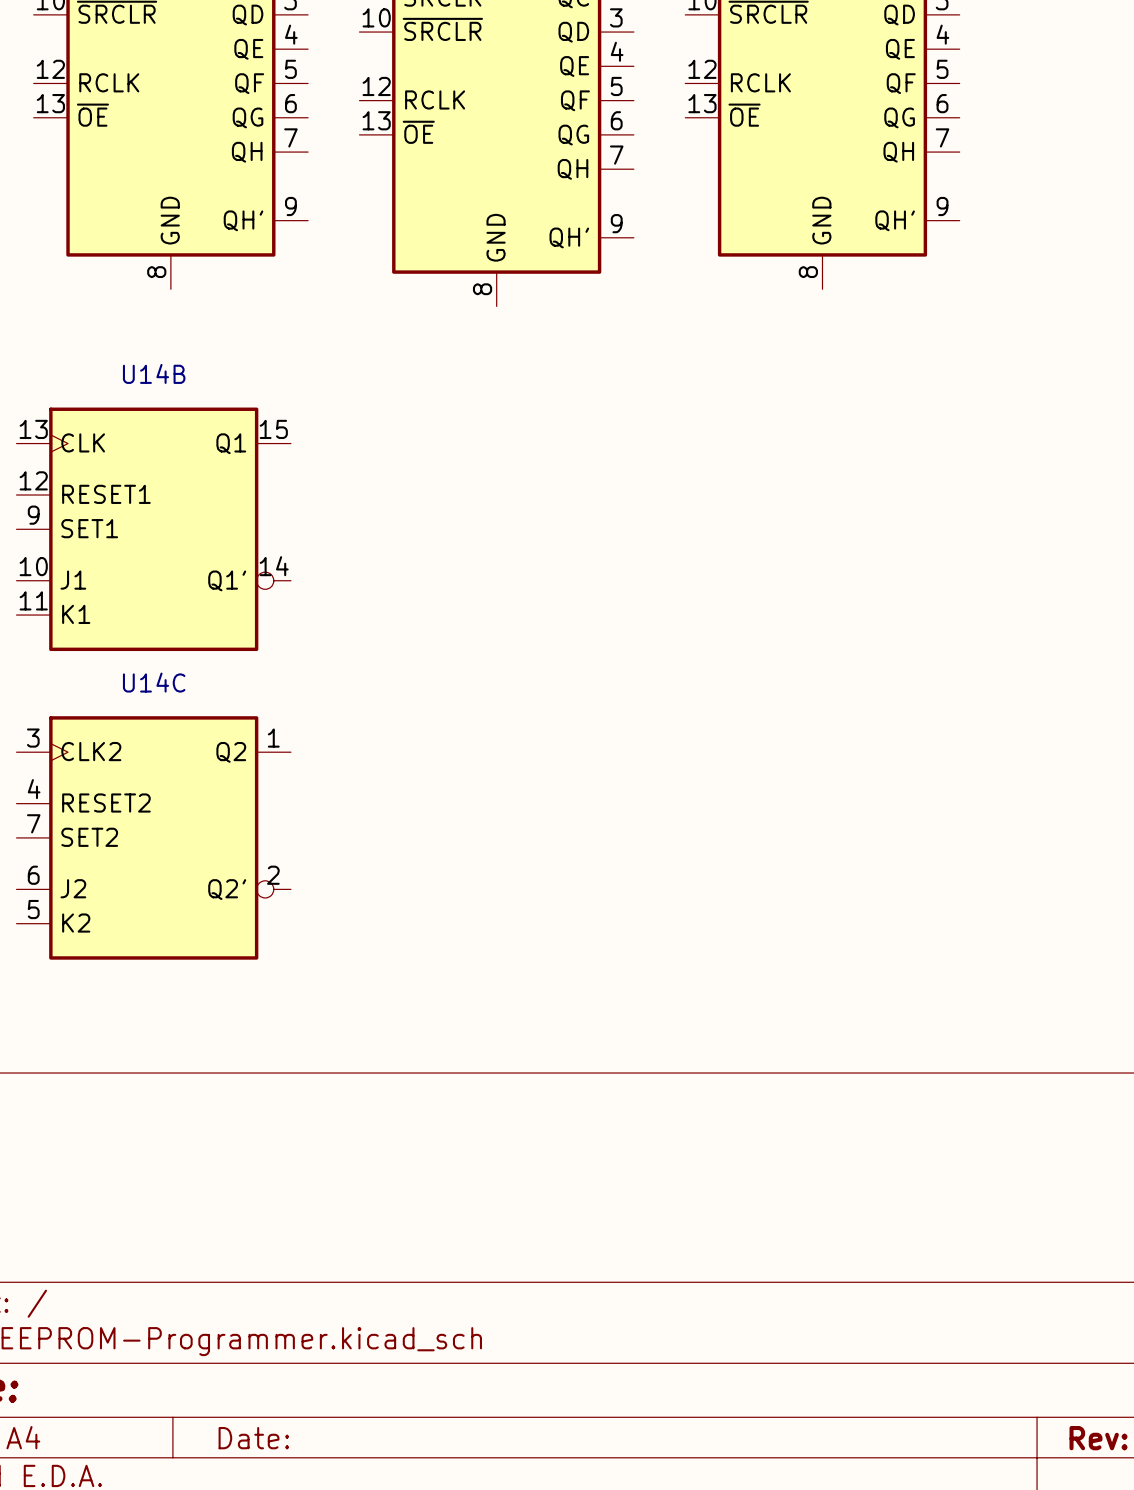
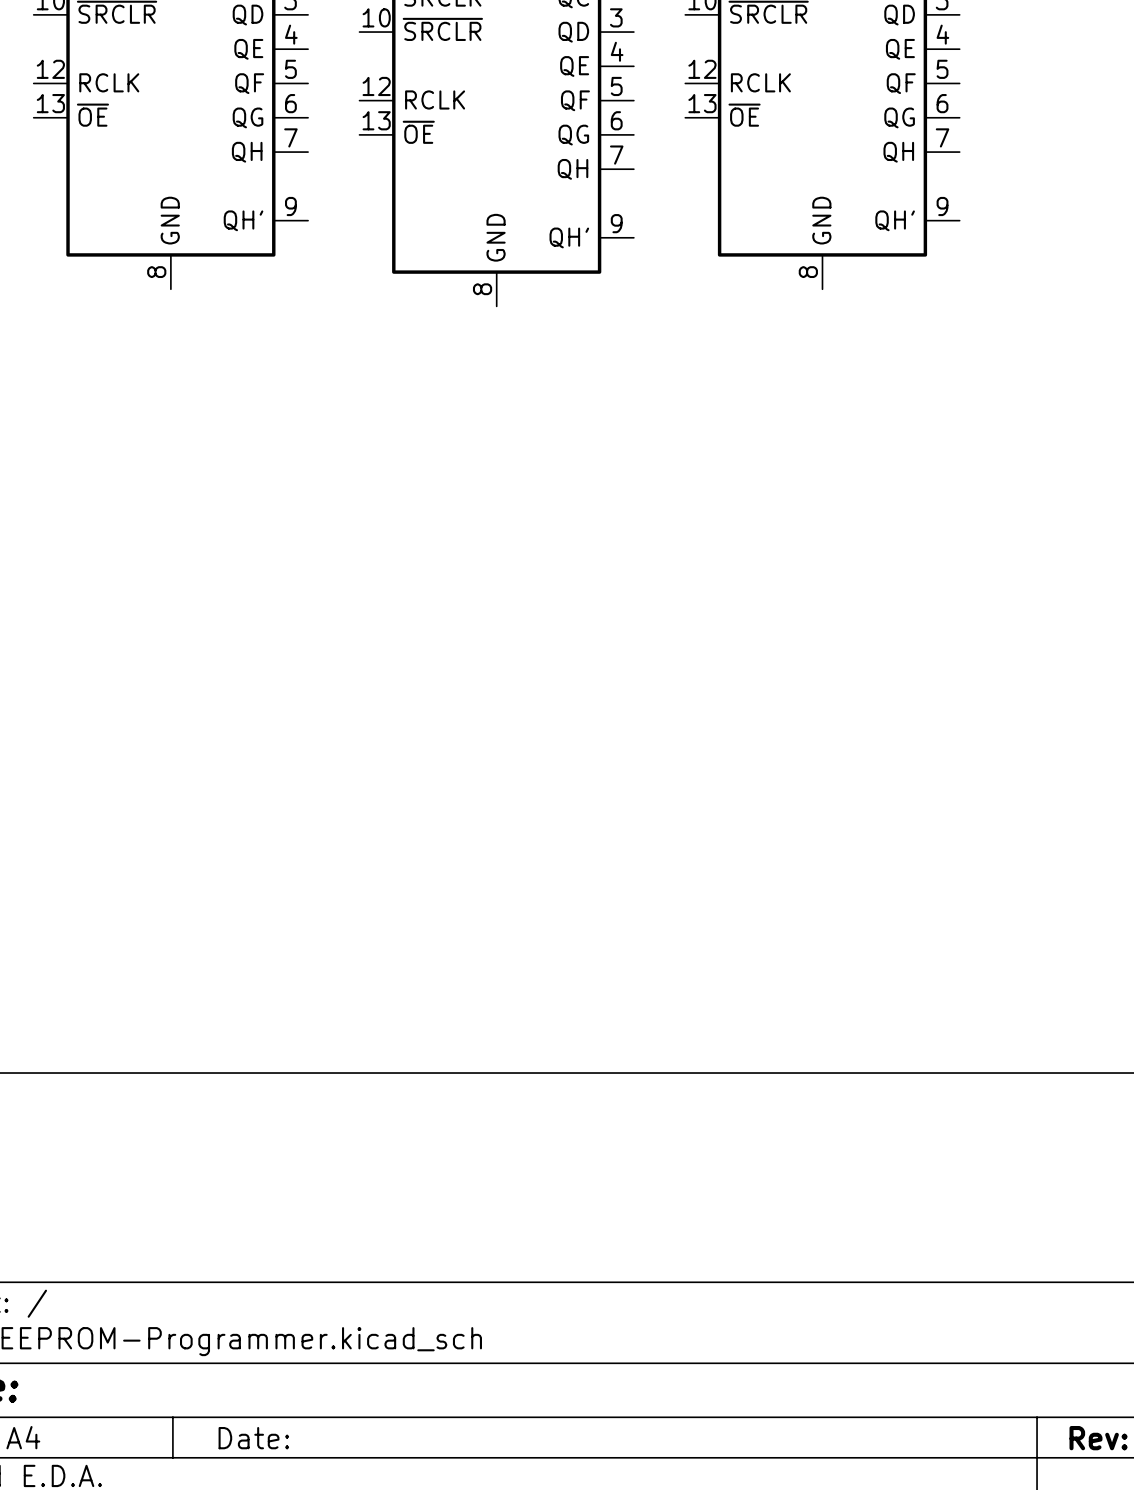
U14B: (153, 529) -> none
U14C: (153, 837) -> none

